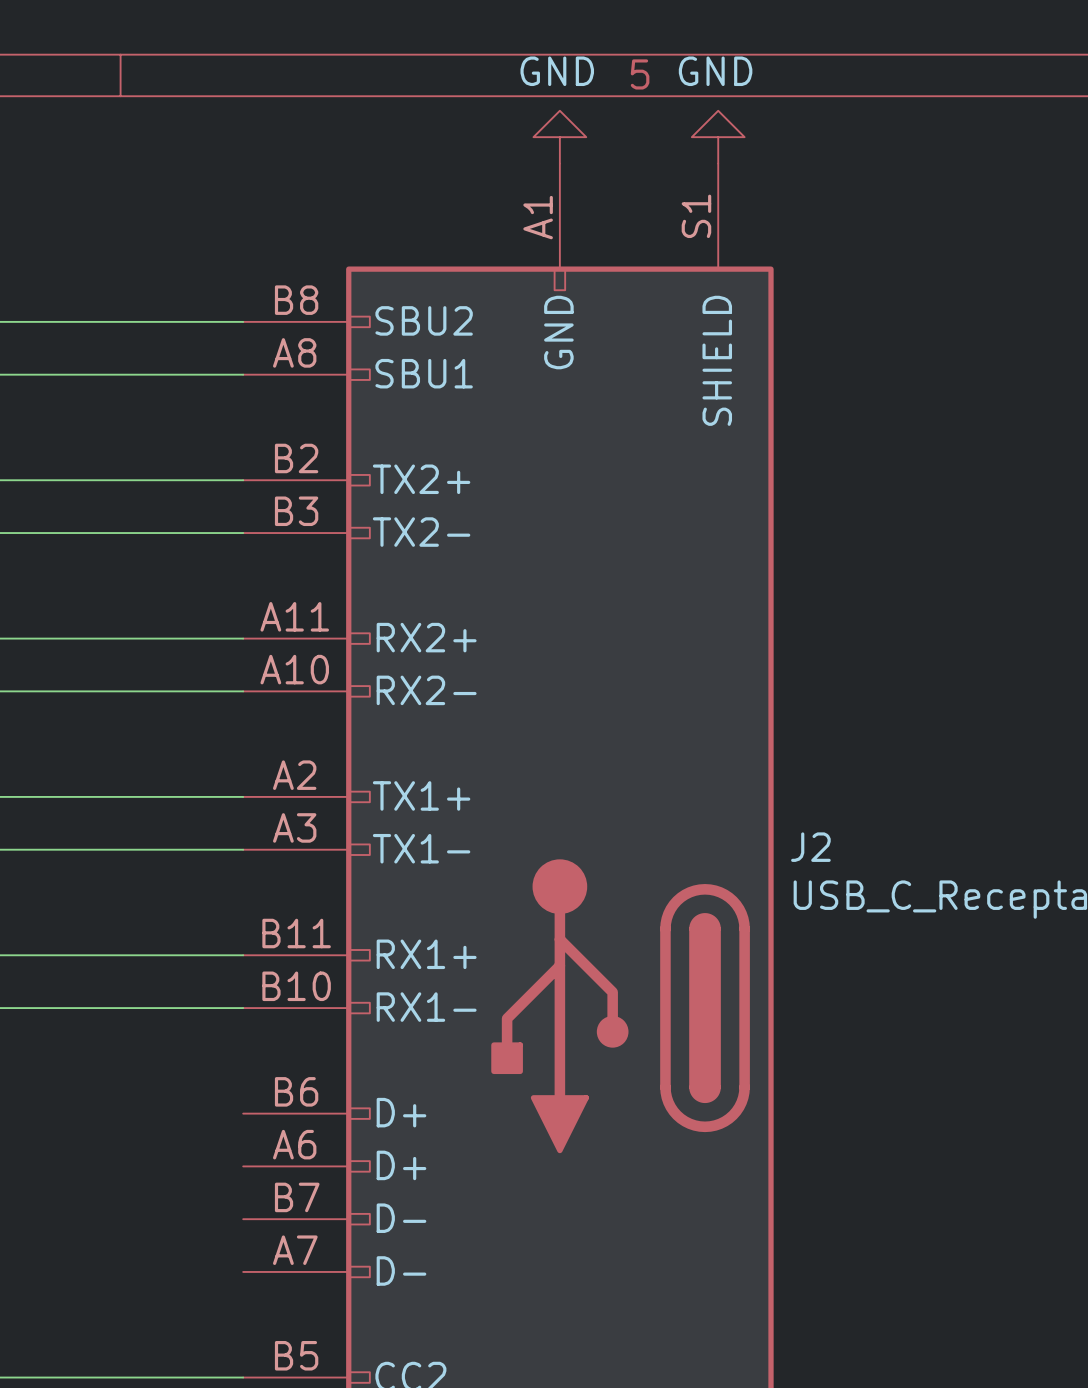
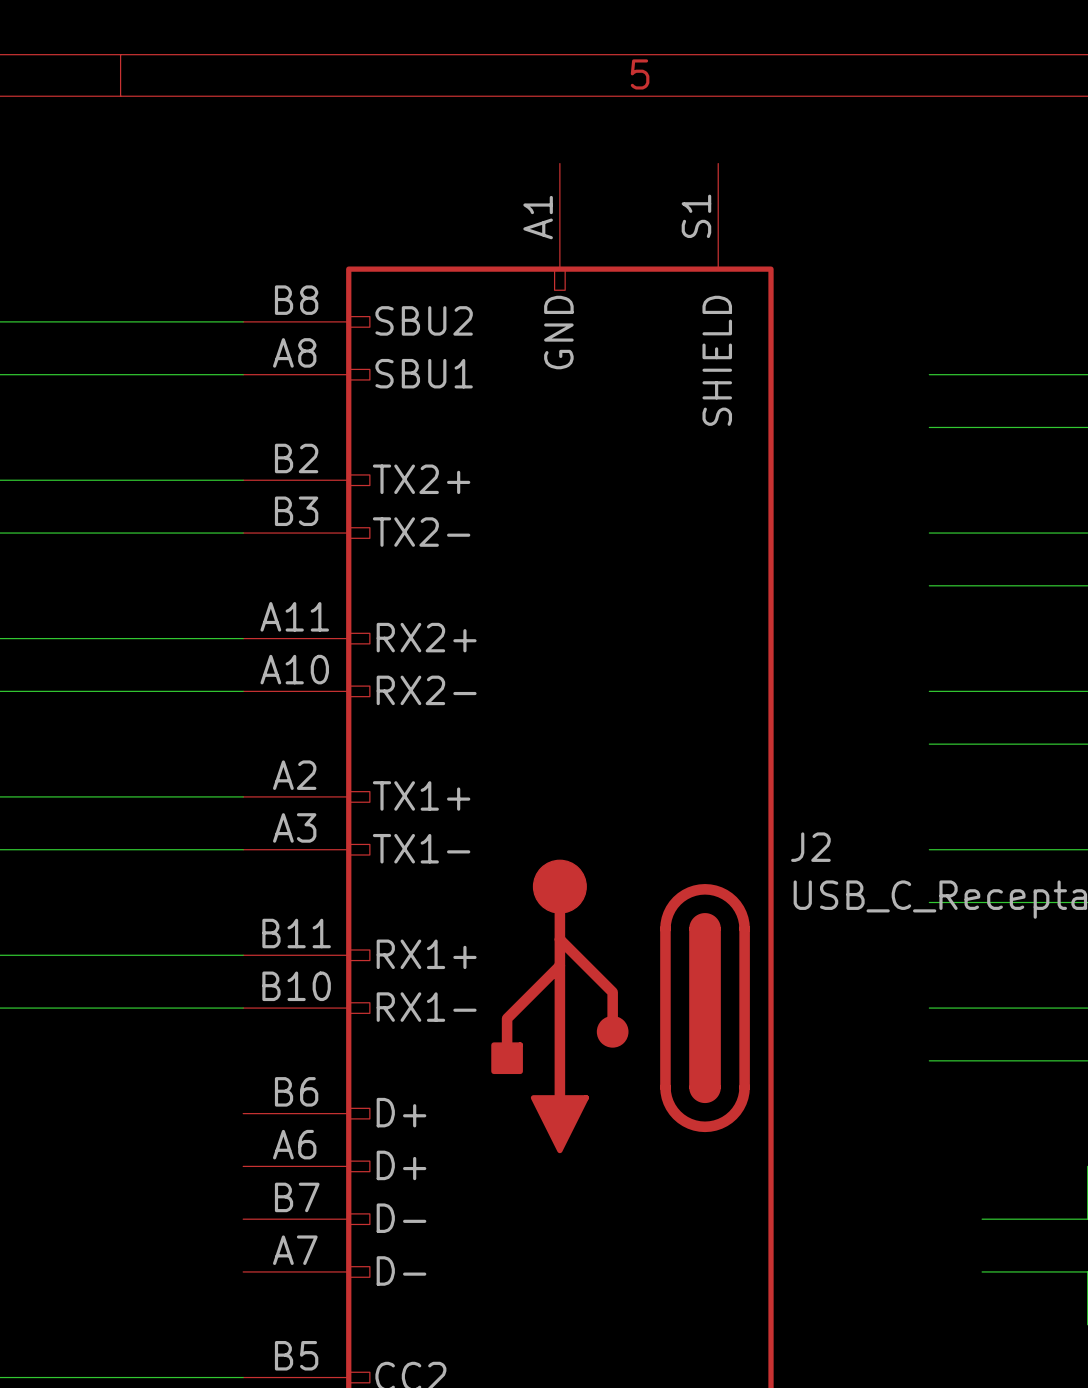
power symbol: GND (559, 137) -> none
power symbol: GND (718, 137) -> none
wire: none -> (929, 374) (1087, 374)
wire: none -> (929, 427) (1087, 427)
wire: none -> (929, 533) (1087, 533)
wire: none -> (929, 585) (1087, 585)
wire: none -> (929, 691) (1087, 691)
wire: none -> (929, 744) (1087, 744)
wire: none -> (929, 849) (1087, 849)
wire: none -> (929, 902) (1087, 902)
wire: none -> (929, 1008) (1087, 1008)
wire: none -> (929, 1060) (1087, 1060)
wire: none -> (1087, 1166) (1087, 1219) (982, 1219)
wire: none -> (982, 1271) (1087, 1271) (1087, 1324)

